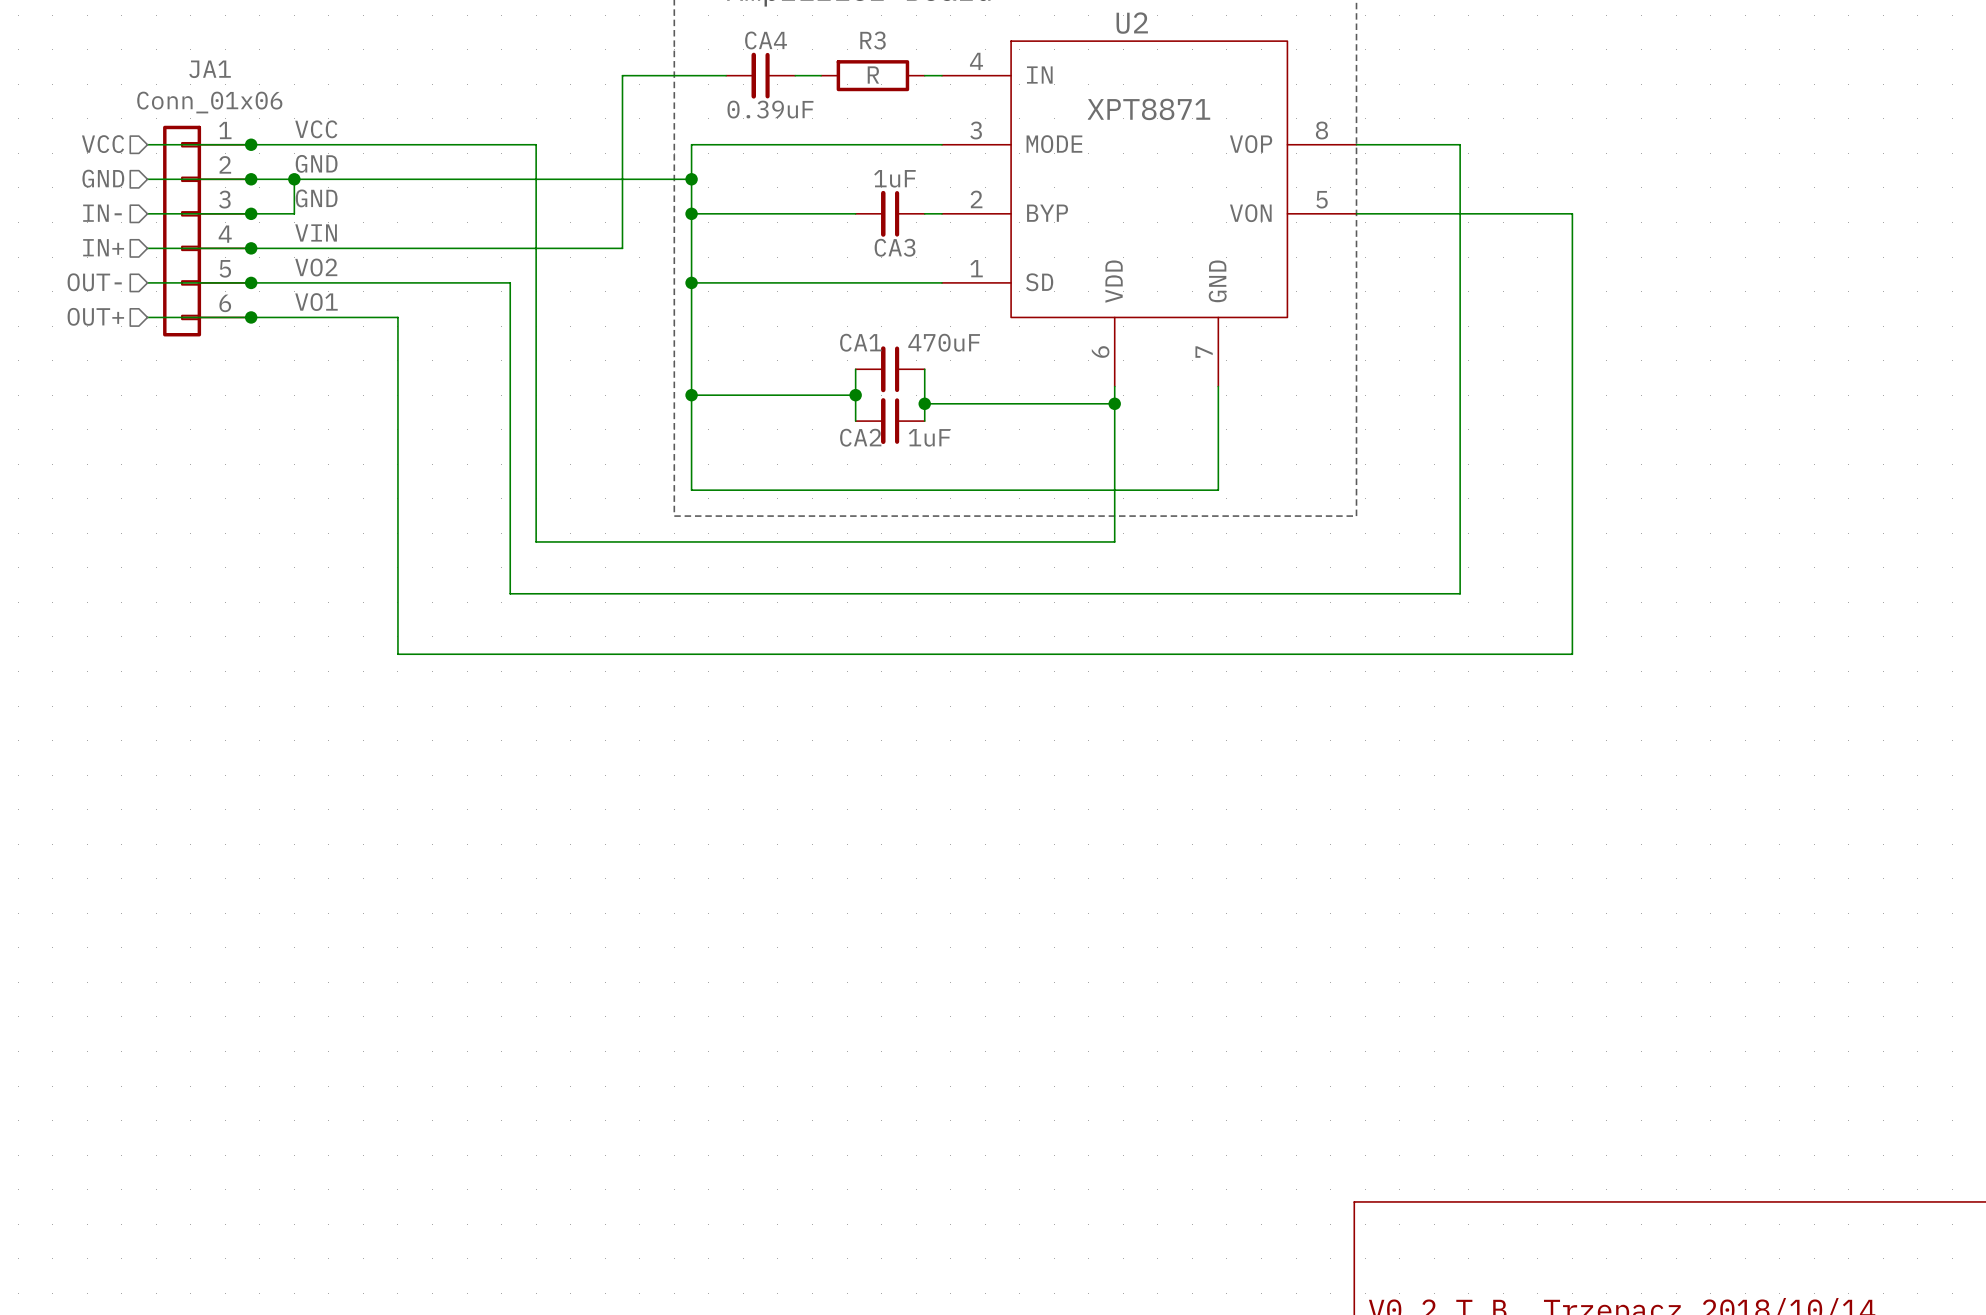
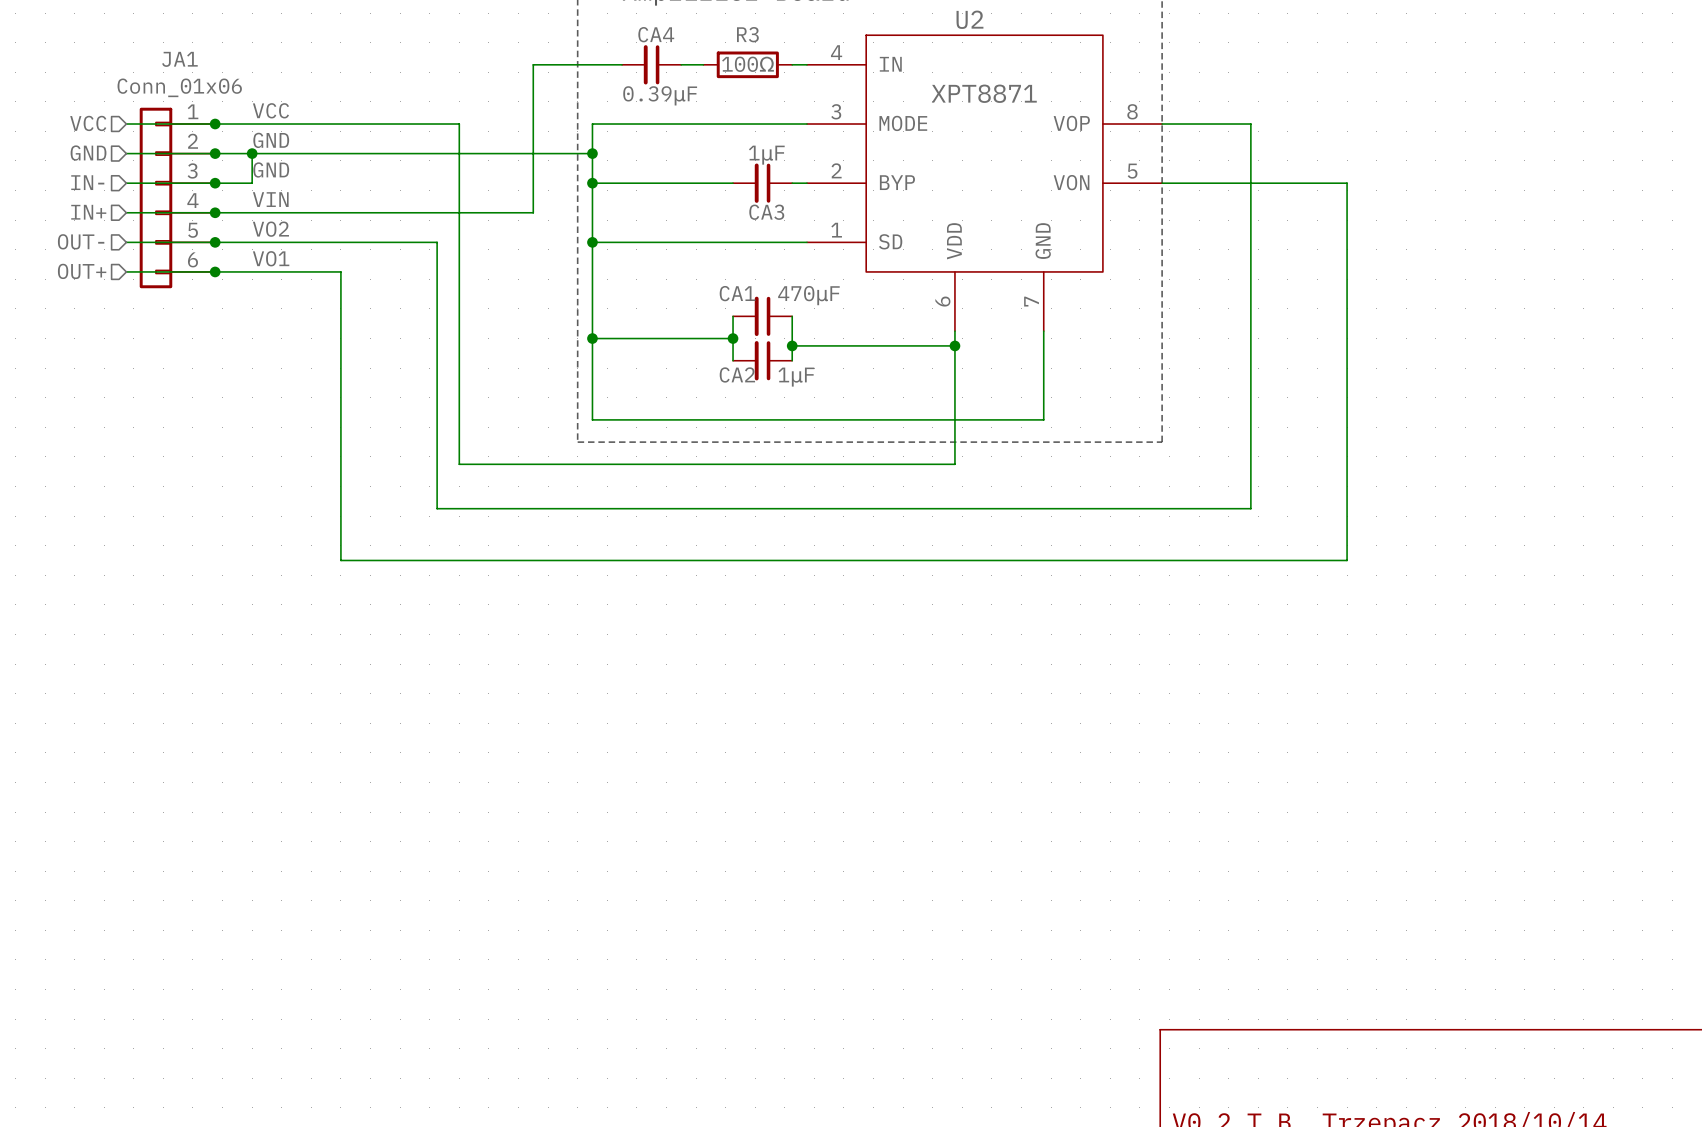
R3 value: R (873, 75) -> 100Ω (747, 64)
CA4 value: 0.39uF (770, 109) -> 0.39μF (660, 95)
CA3 value: 1uF (894, 178) -> 1μF (766, 155)
CA1 value: 470uF (944, 342) -> 470μF (808, 295)
CA2 value: 1uF (929, 437) -> 1μF (796, 377)

